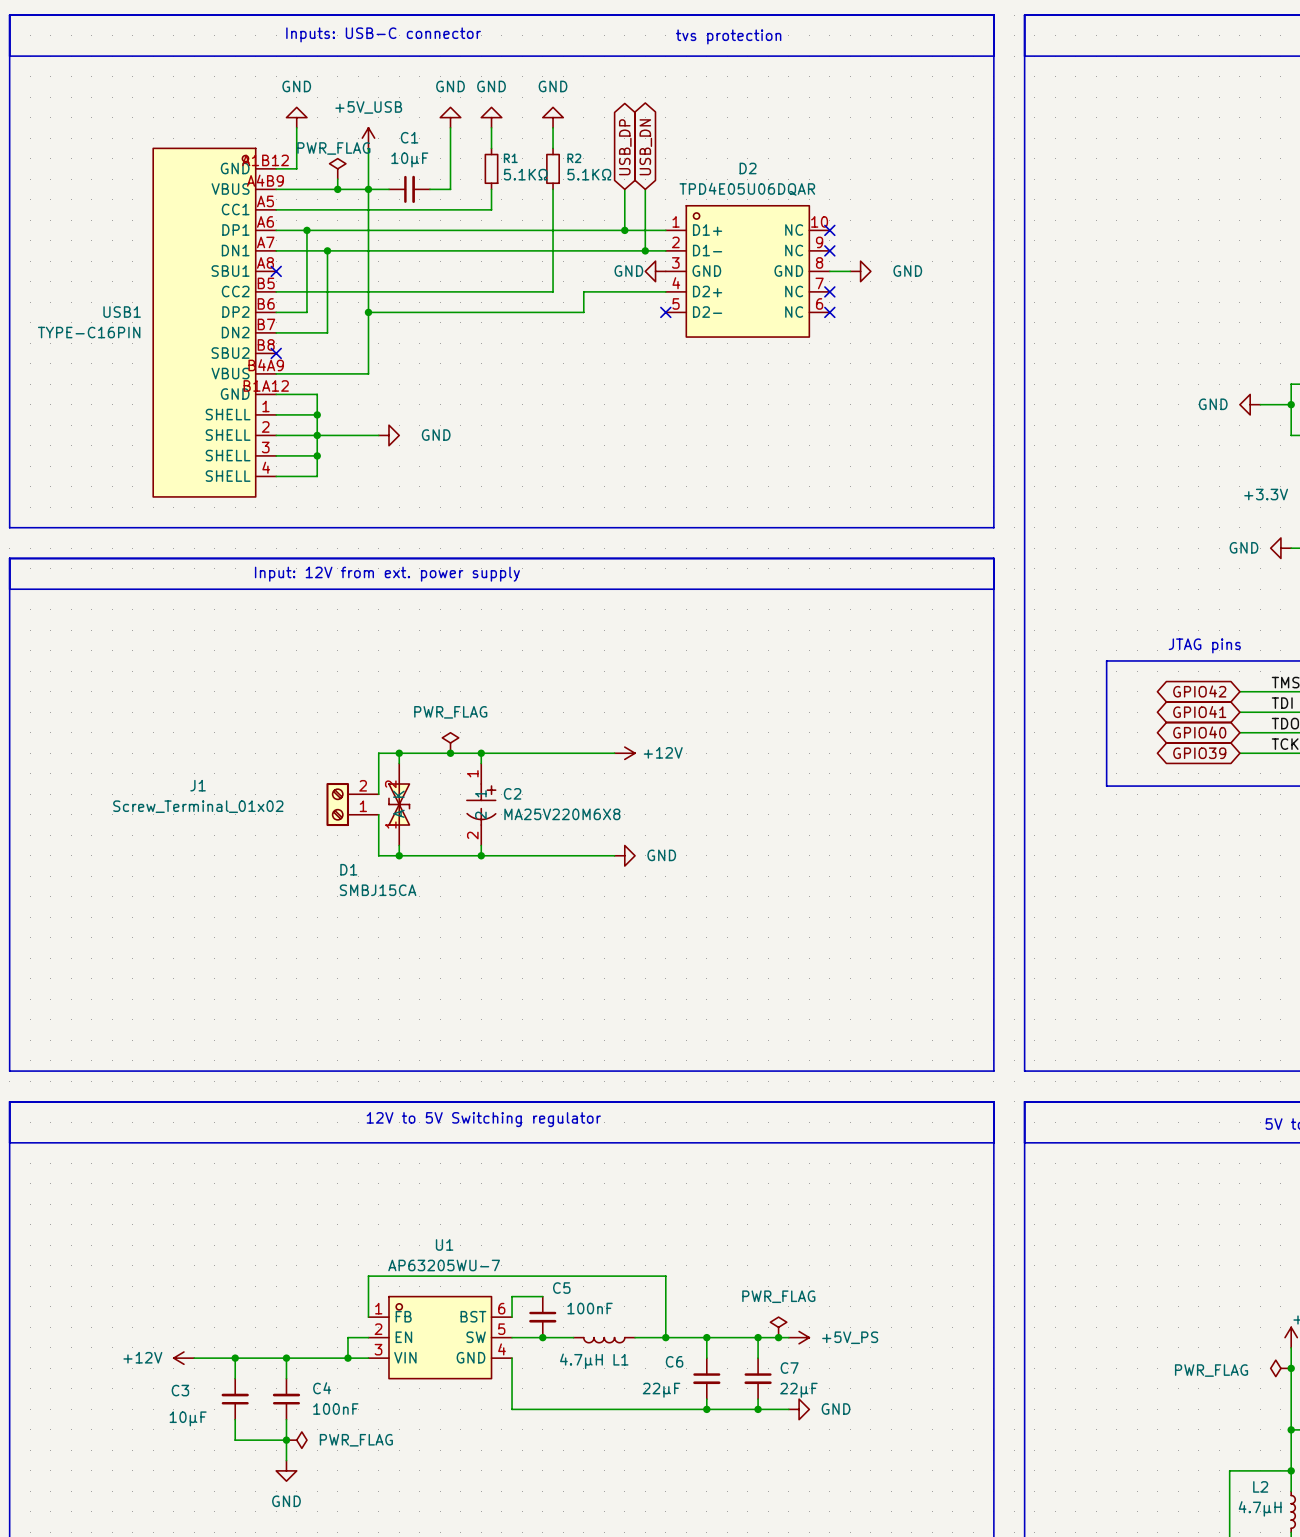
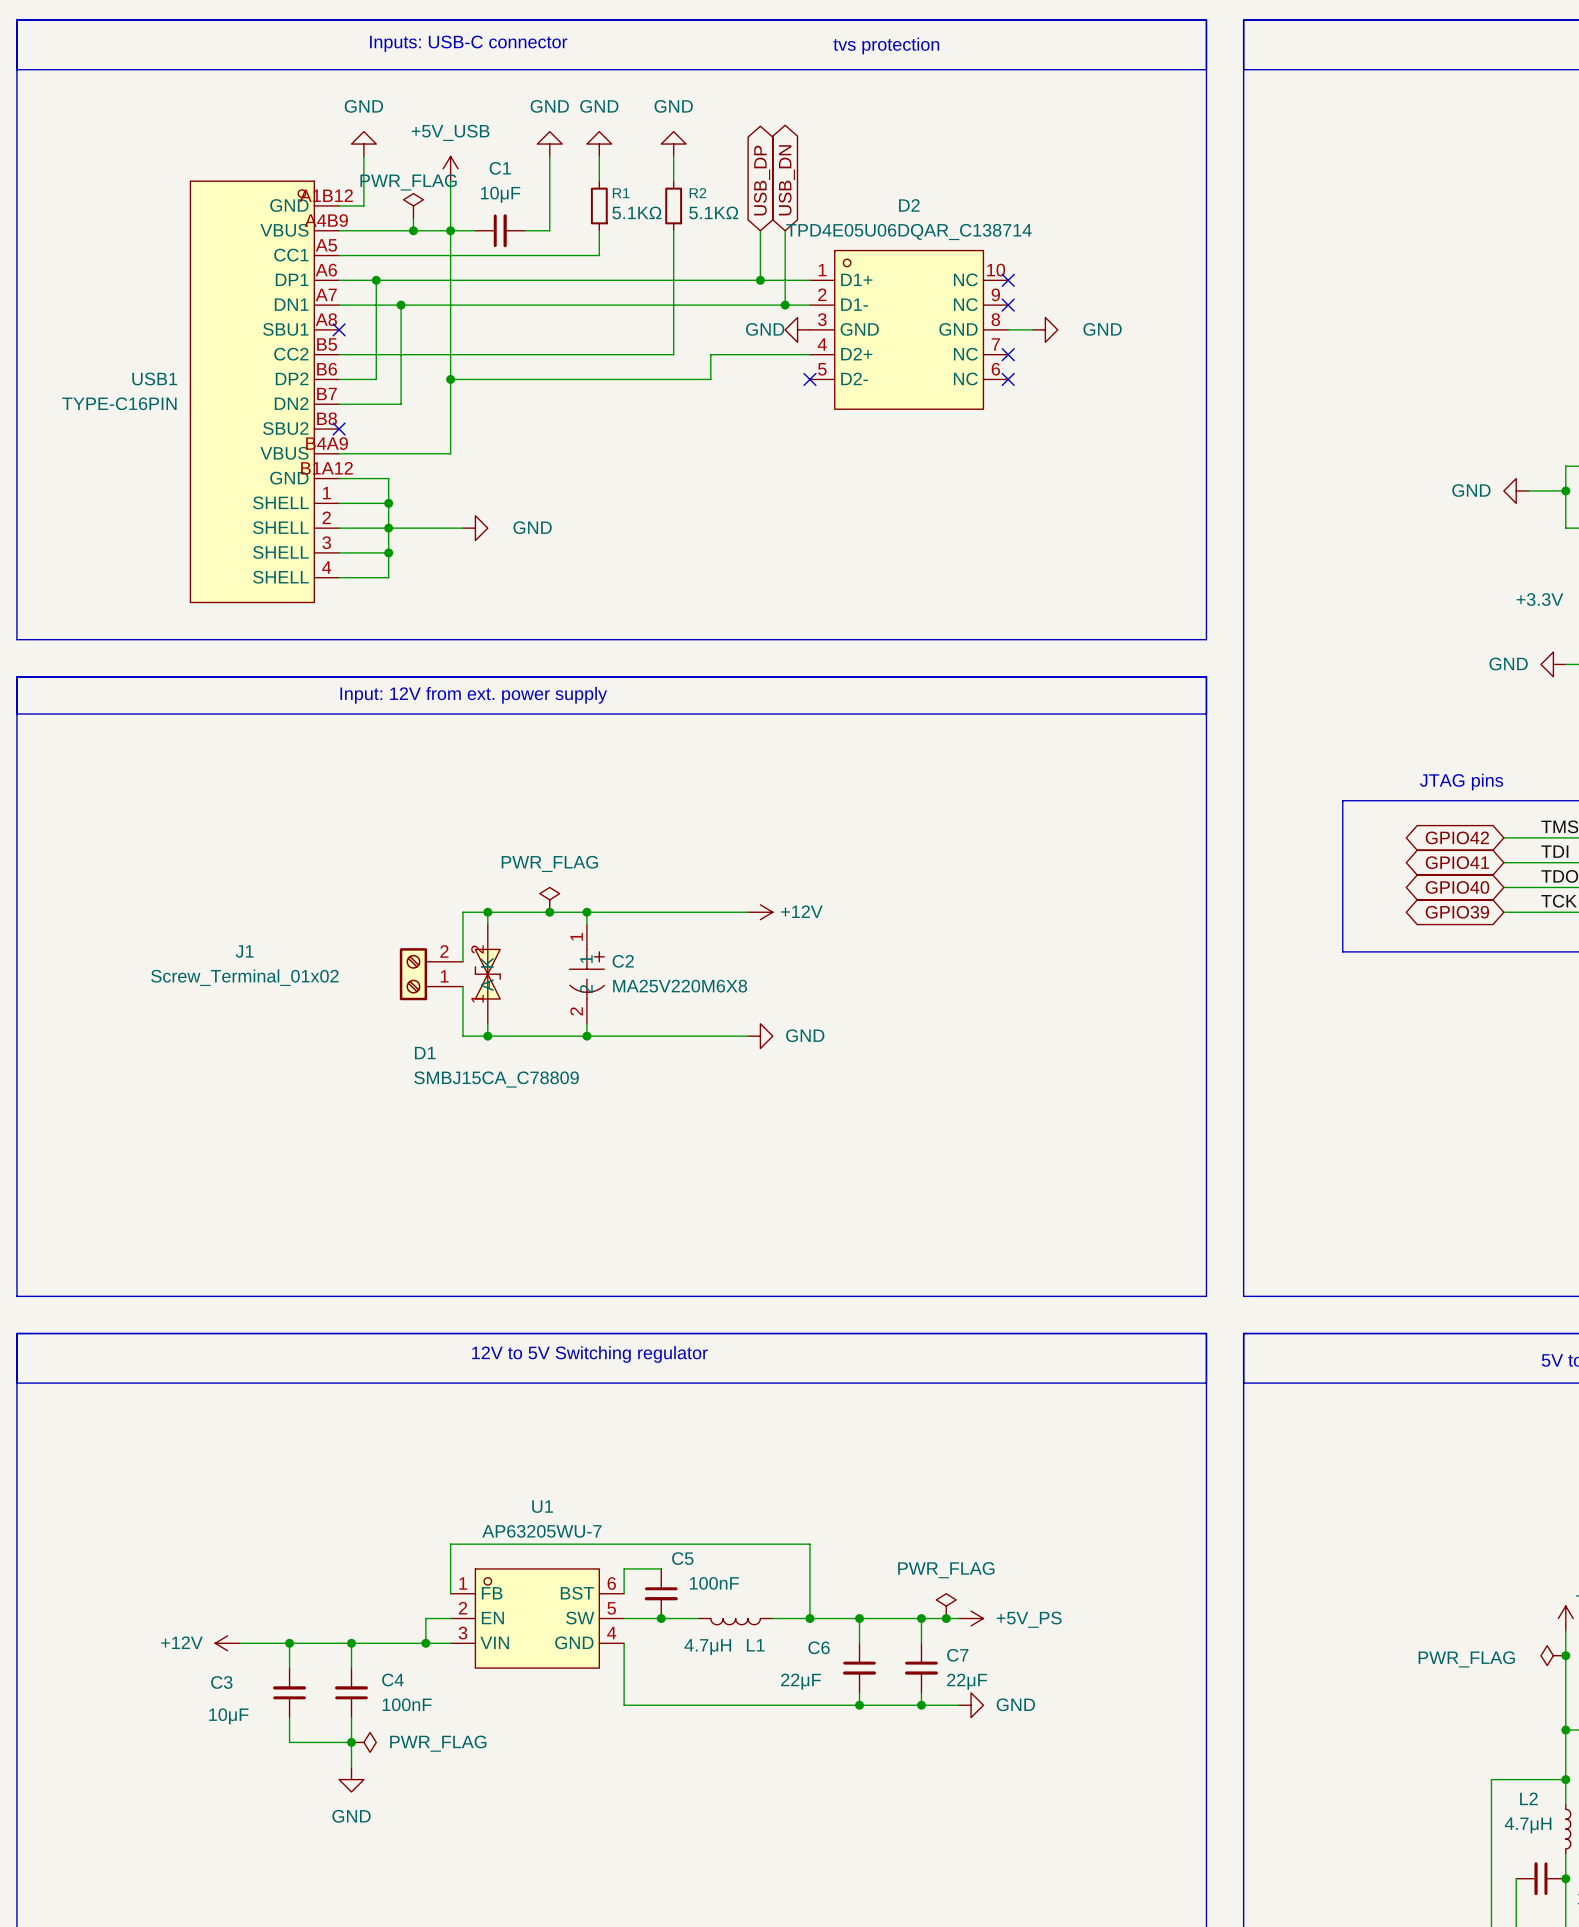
D2 value: TPD4E05U06DQAR (747, 189) -> TPD4E05U06DQAR_C138714 (909, 231)
D1 value: SMBJ15CA (378, 890) -> SMBJ15CA_C78809 (496, 1079)

